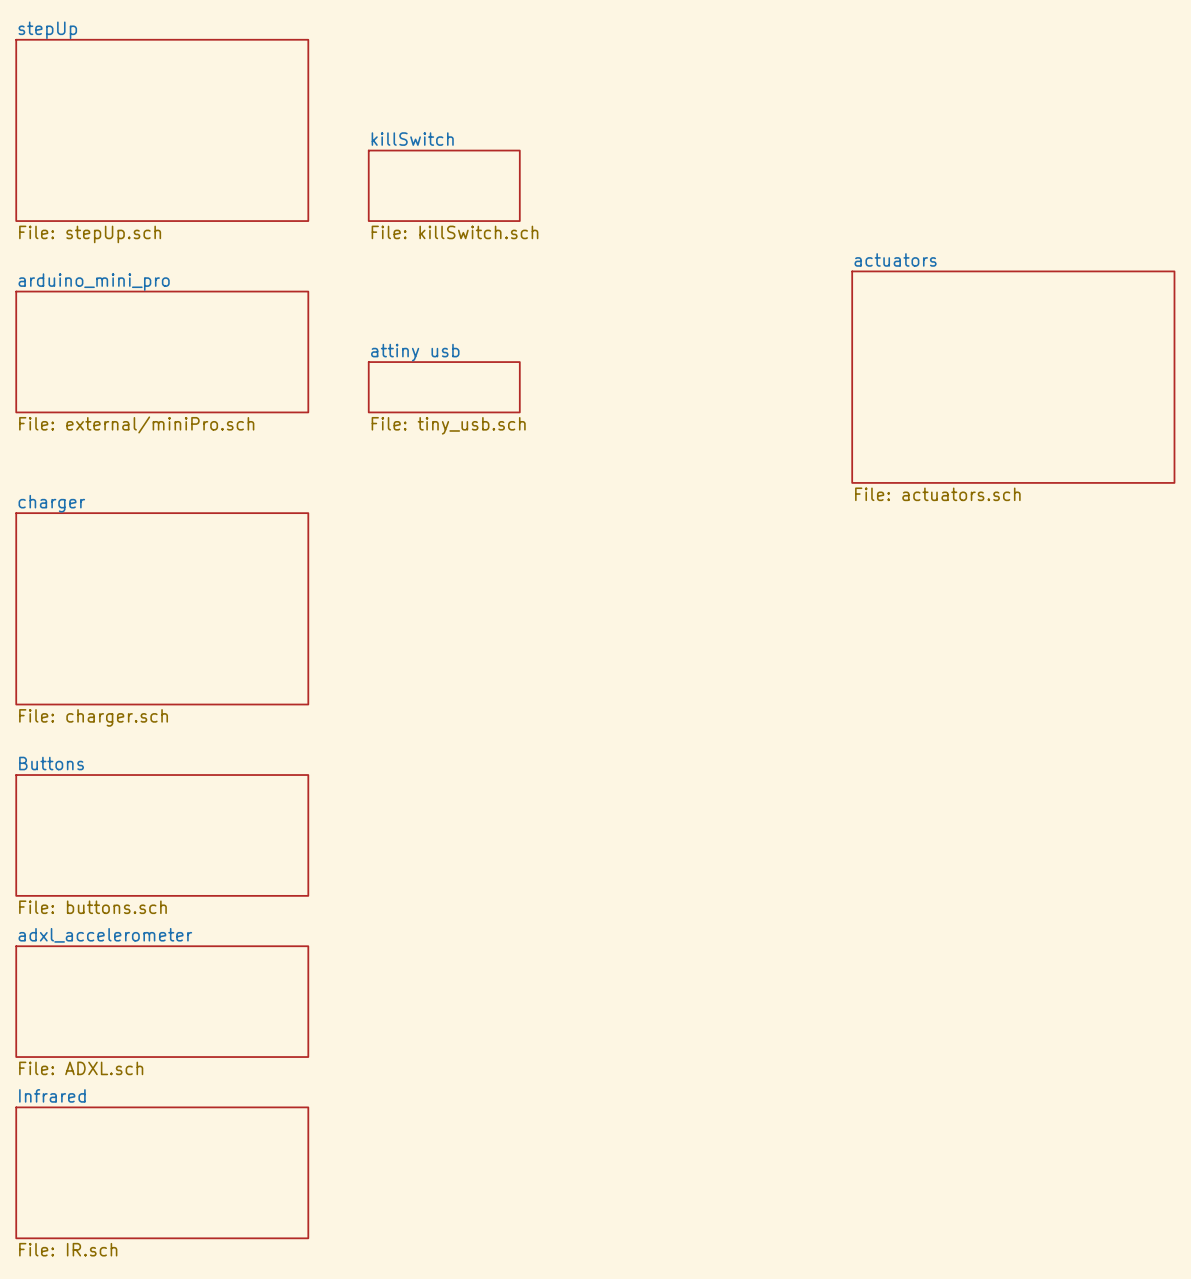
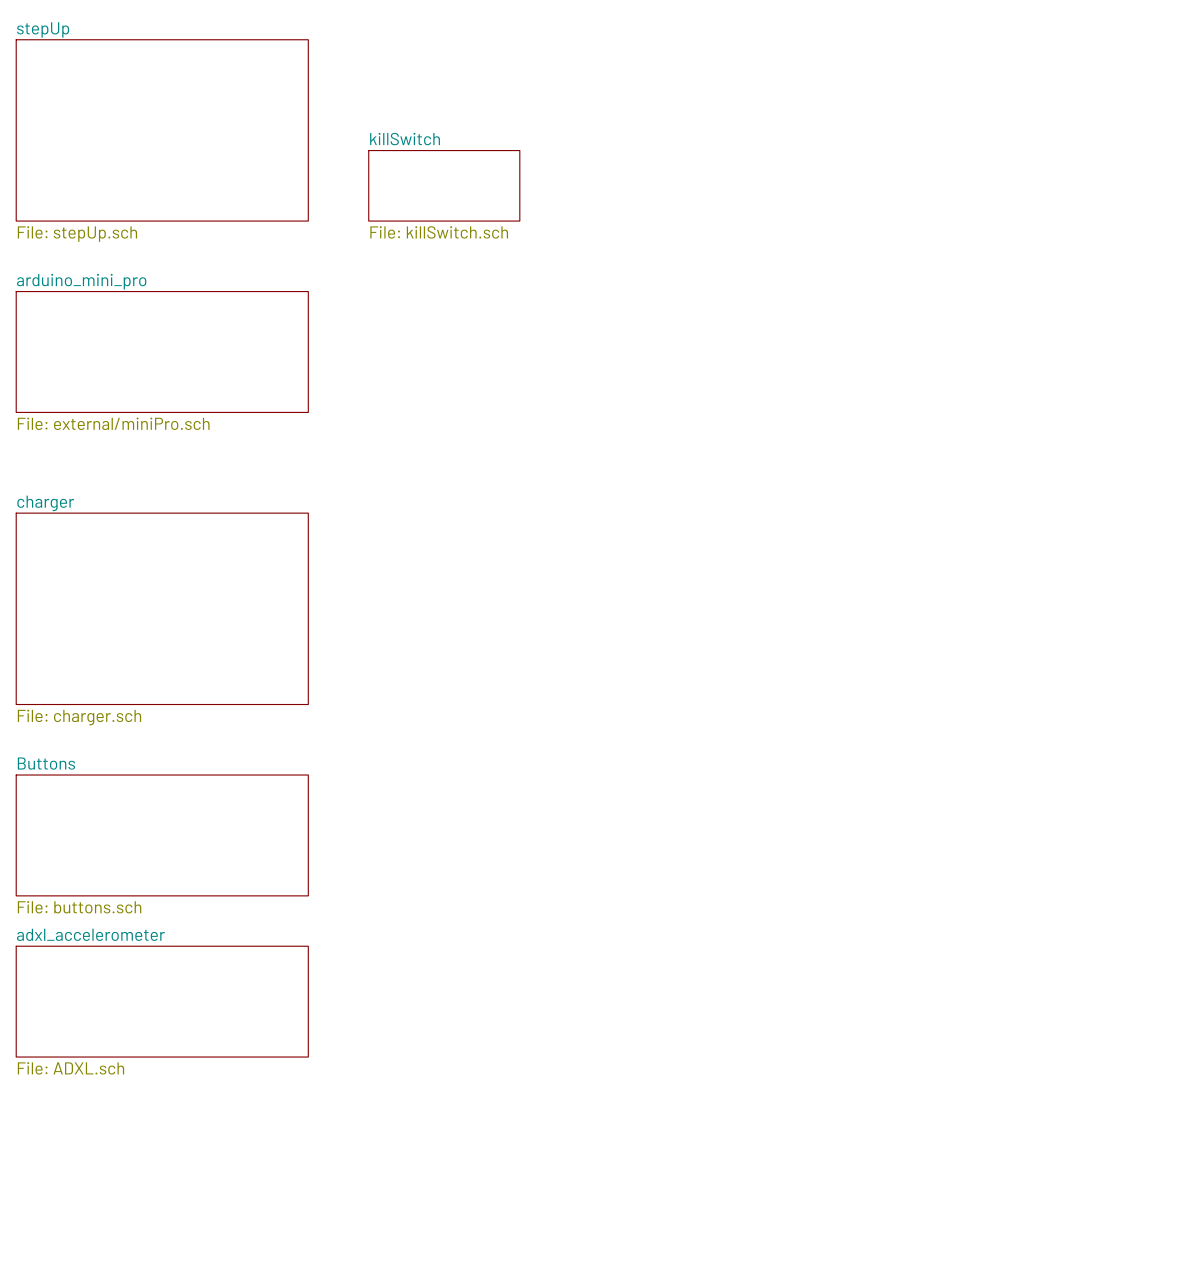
sheet actuators: File: actuators.sch (1013, 377) -> none
sheet attiny usb: File: tiny_usb.sch (444, 387) -> none
sheet Infrared: File: IR.sch (162, 1172) -> none

